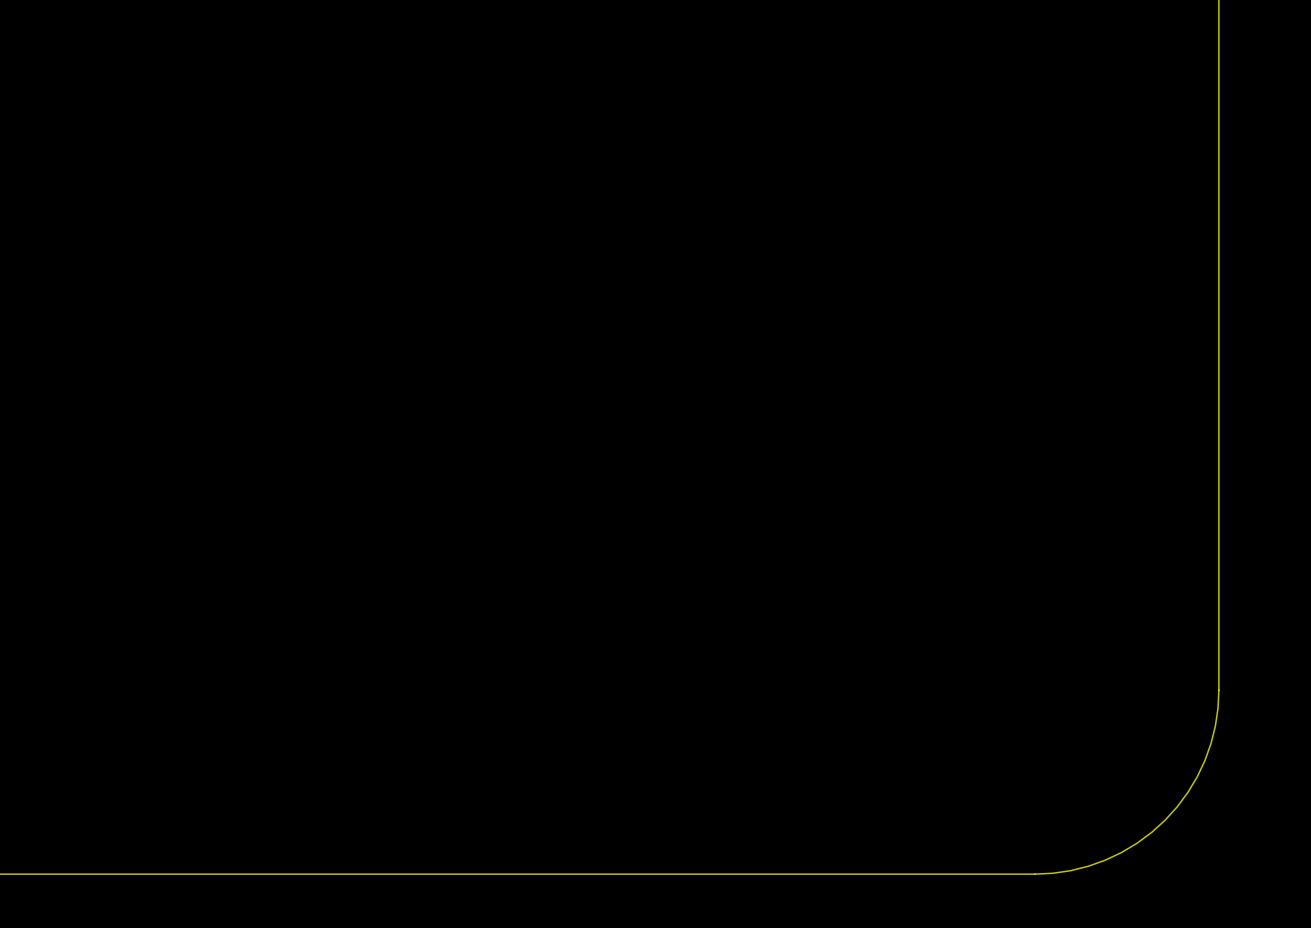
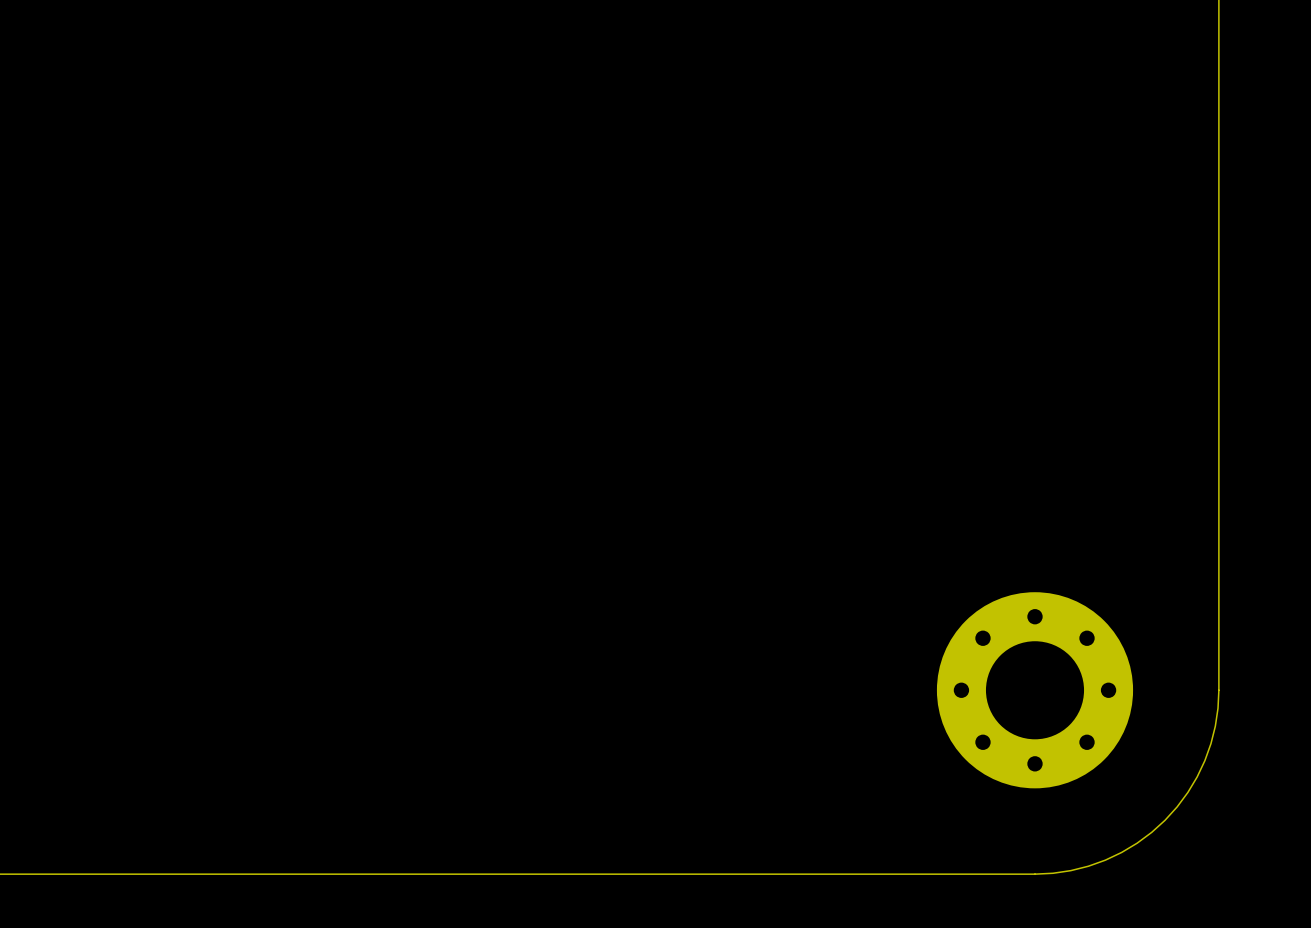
part: none -> (1035, 690)

